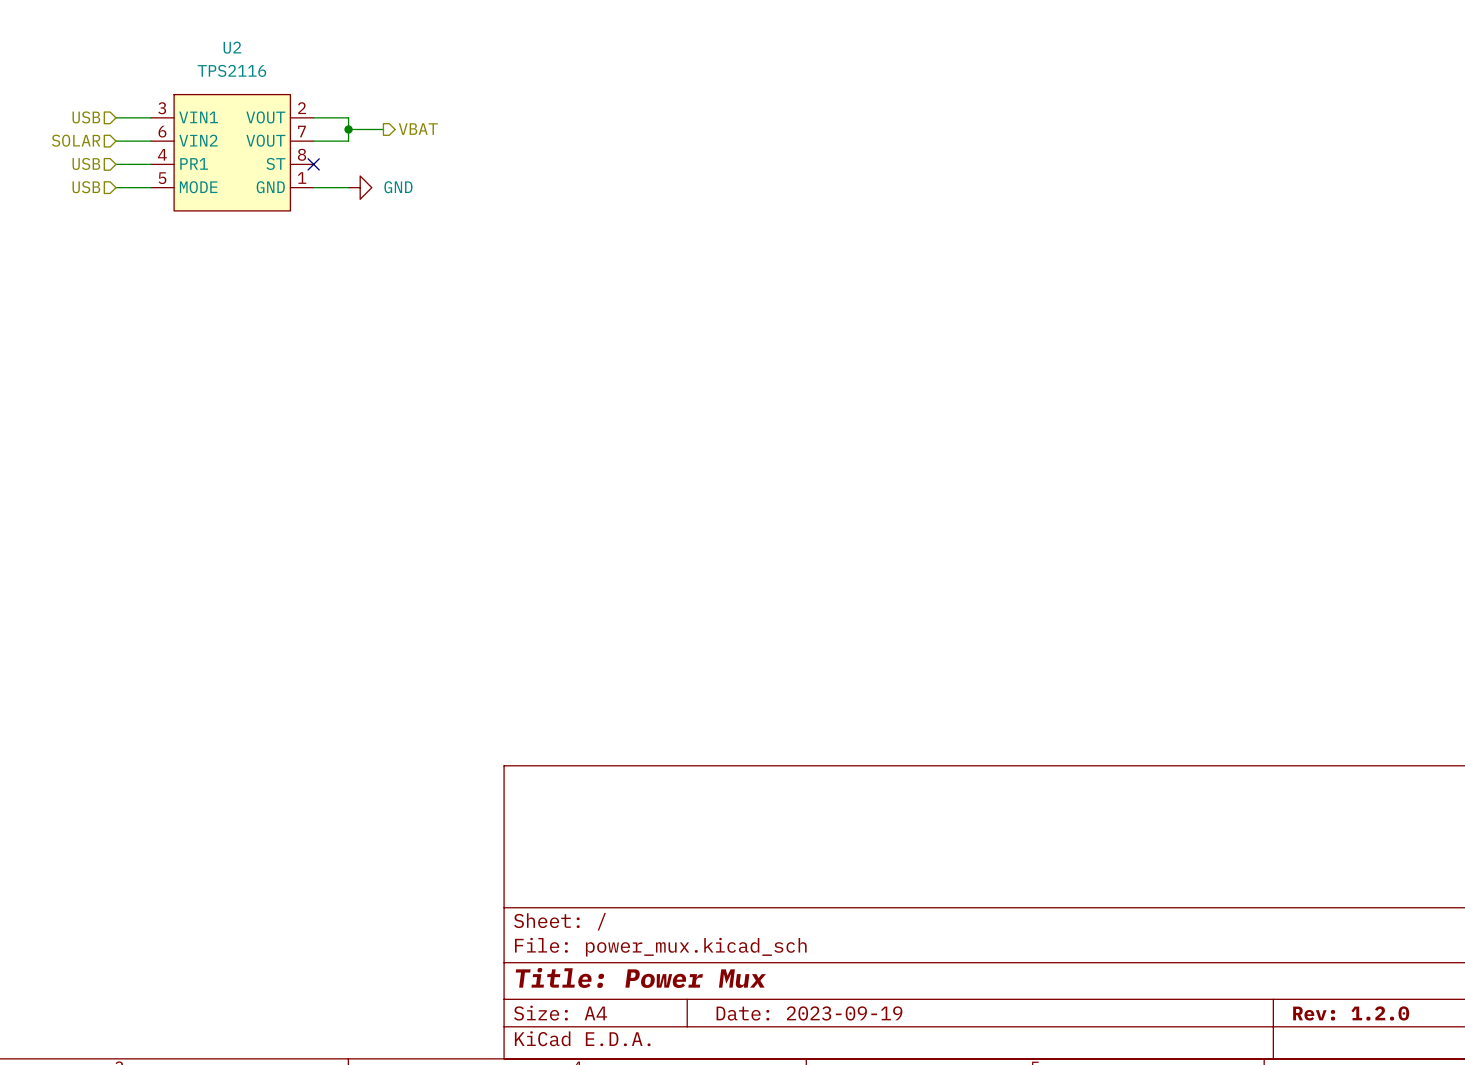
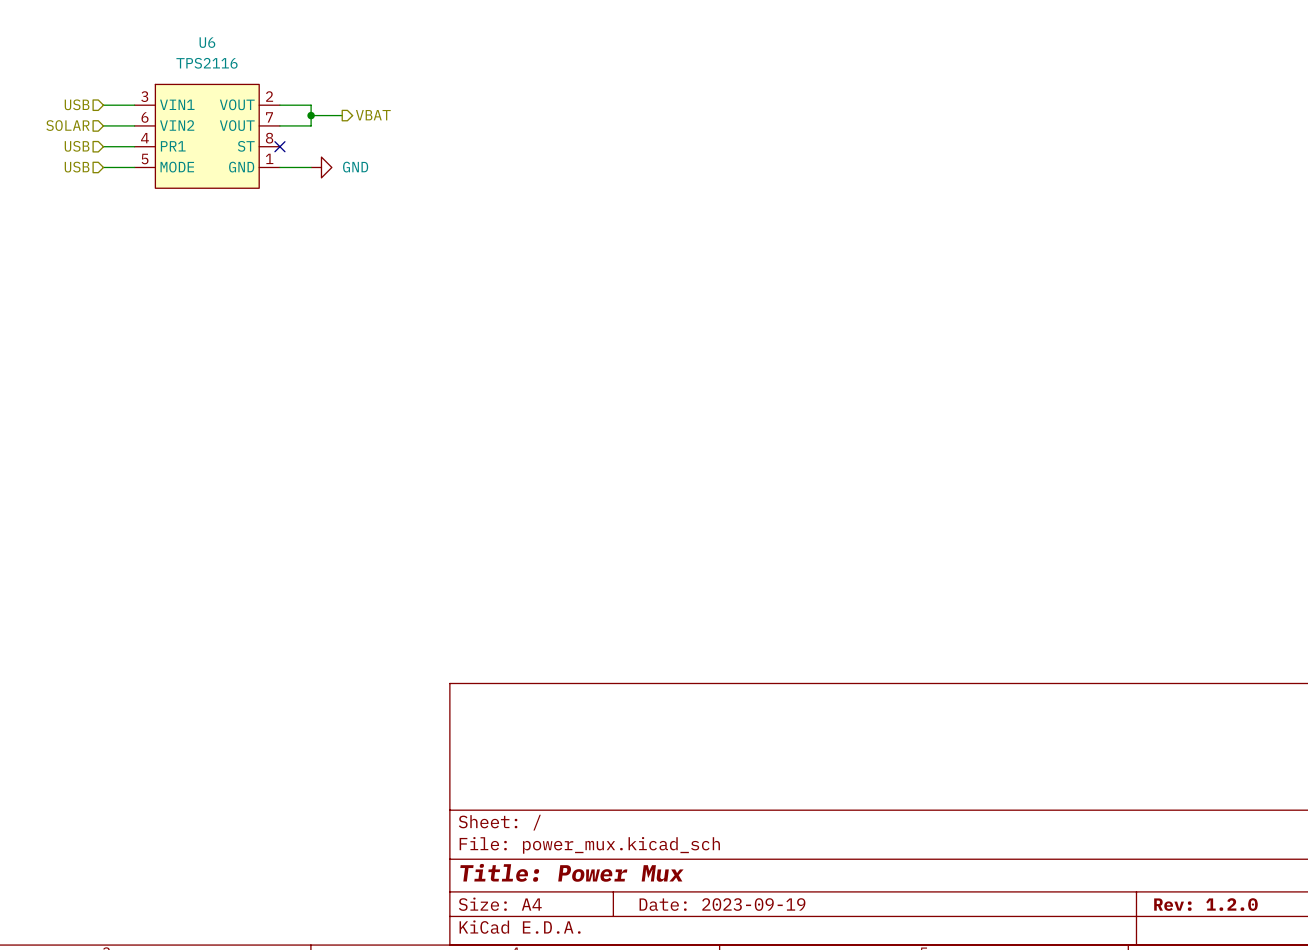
U2 name: U2 (232, 47) -> U6 (207, 42)

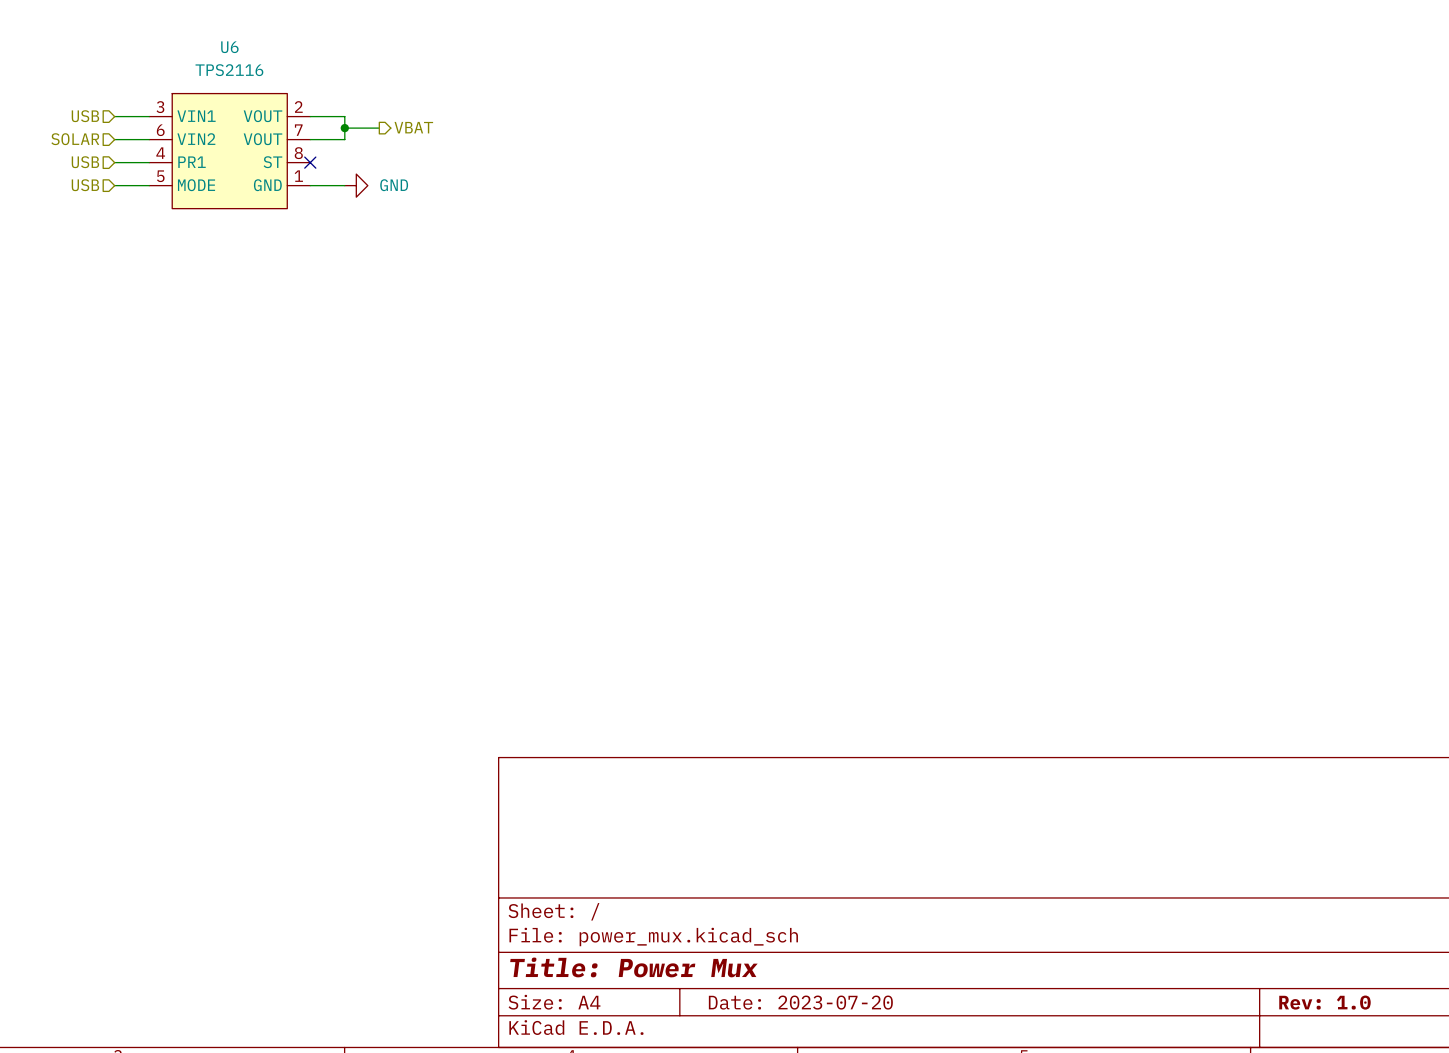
title block: Date: 2023-09-19 (722, 904) -> Date: 2023-07-20 (800, 1002)
title block: Rev: 1.2.0 (1205, 904) -> Rev: 1.0 (1324, 1002)

